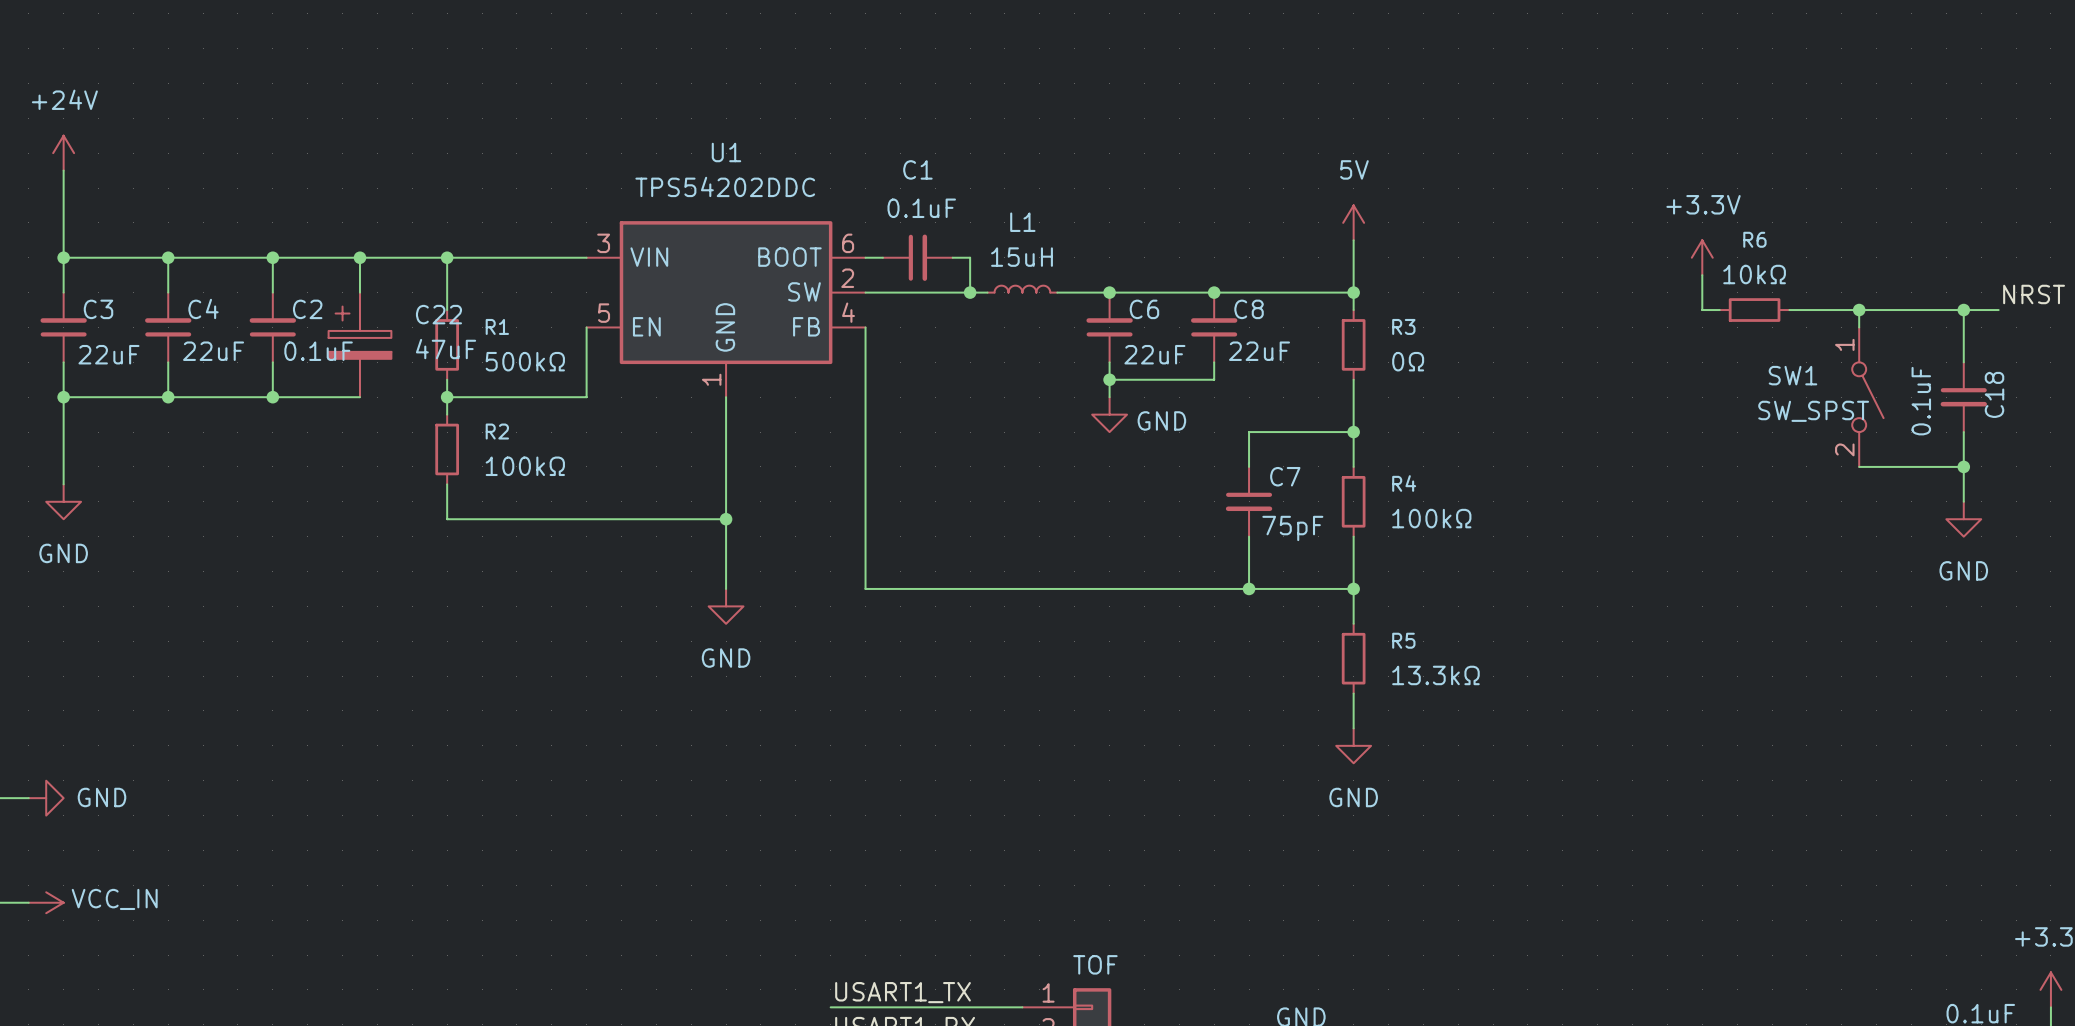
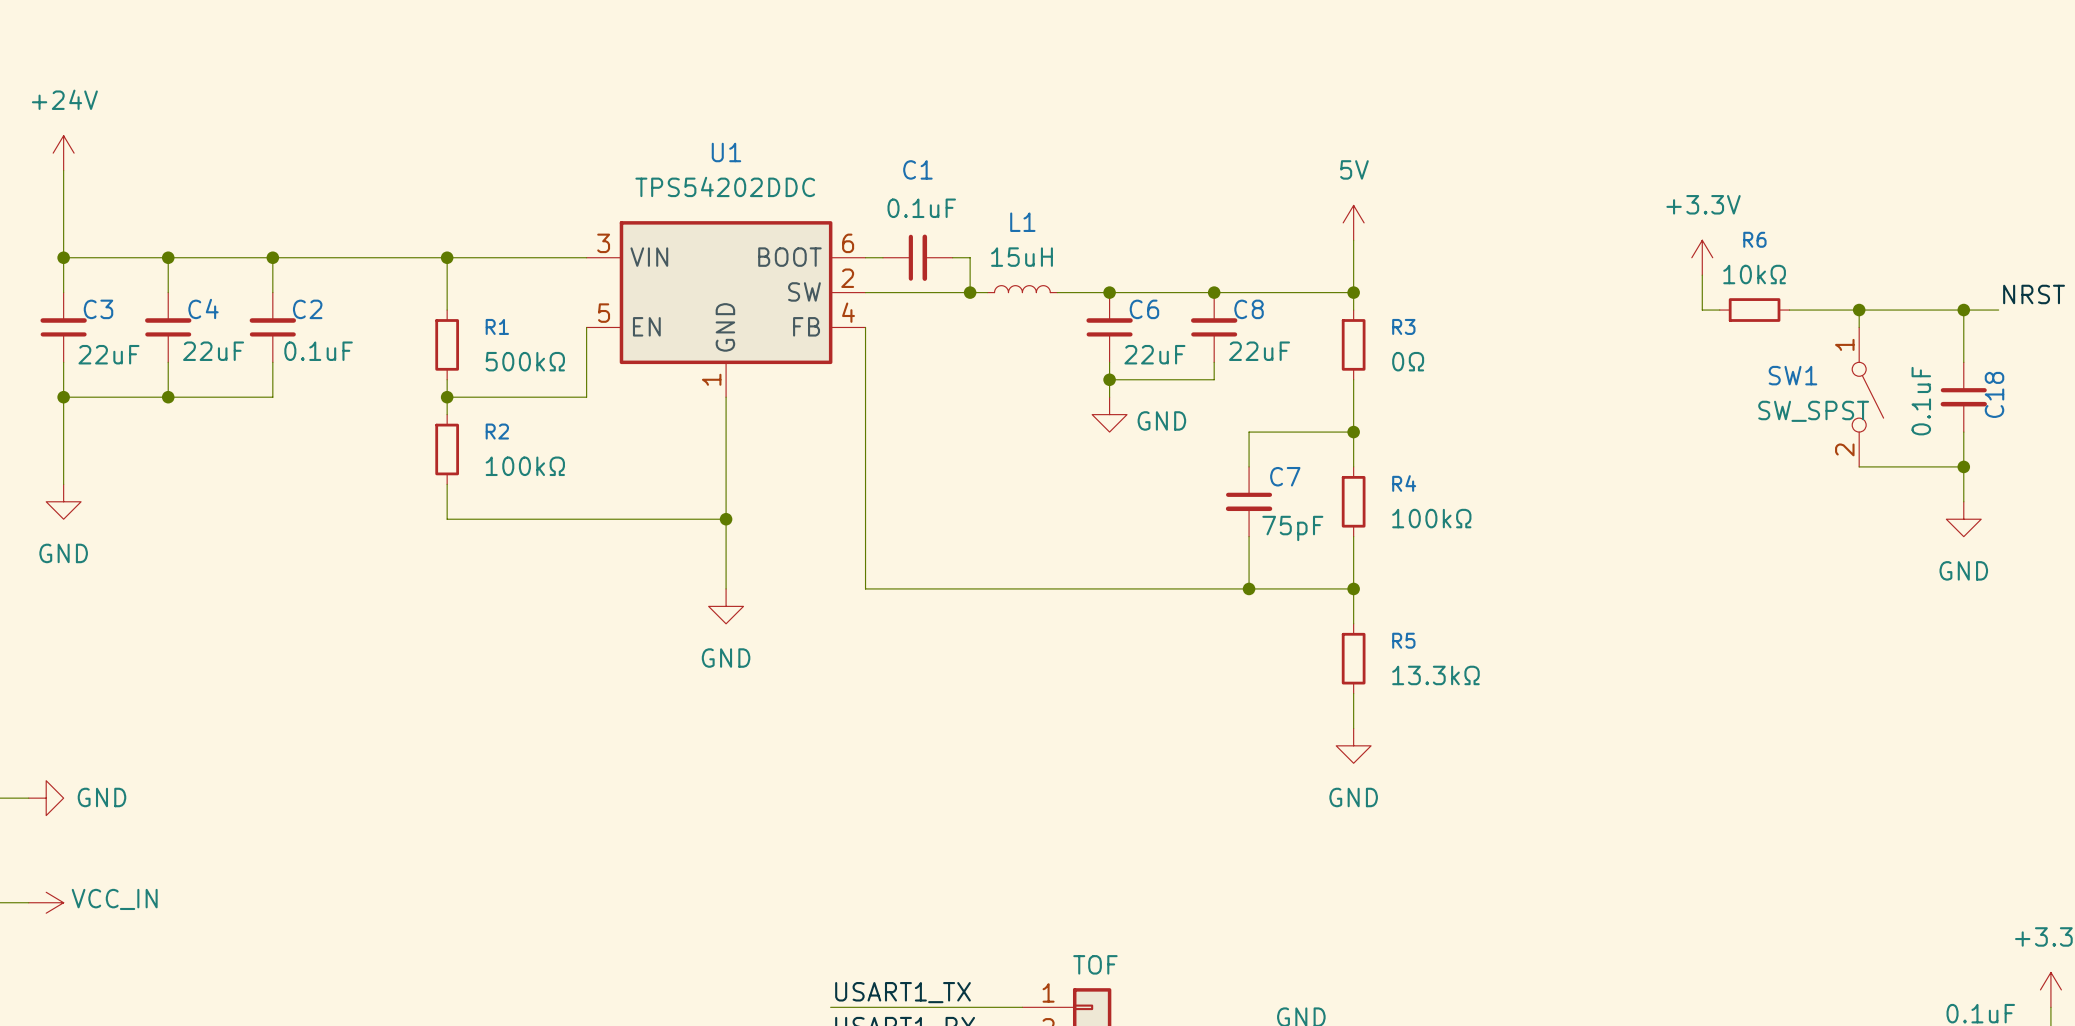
wire: (359, 257) (359, 292) -> none
junction: (359, 257) -> none
C22: 47uF (359, 344) -> none
wire: (272, 397) (359, 397) -> none
junction: (272, 397) -> none

